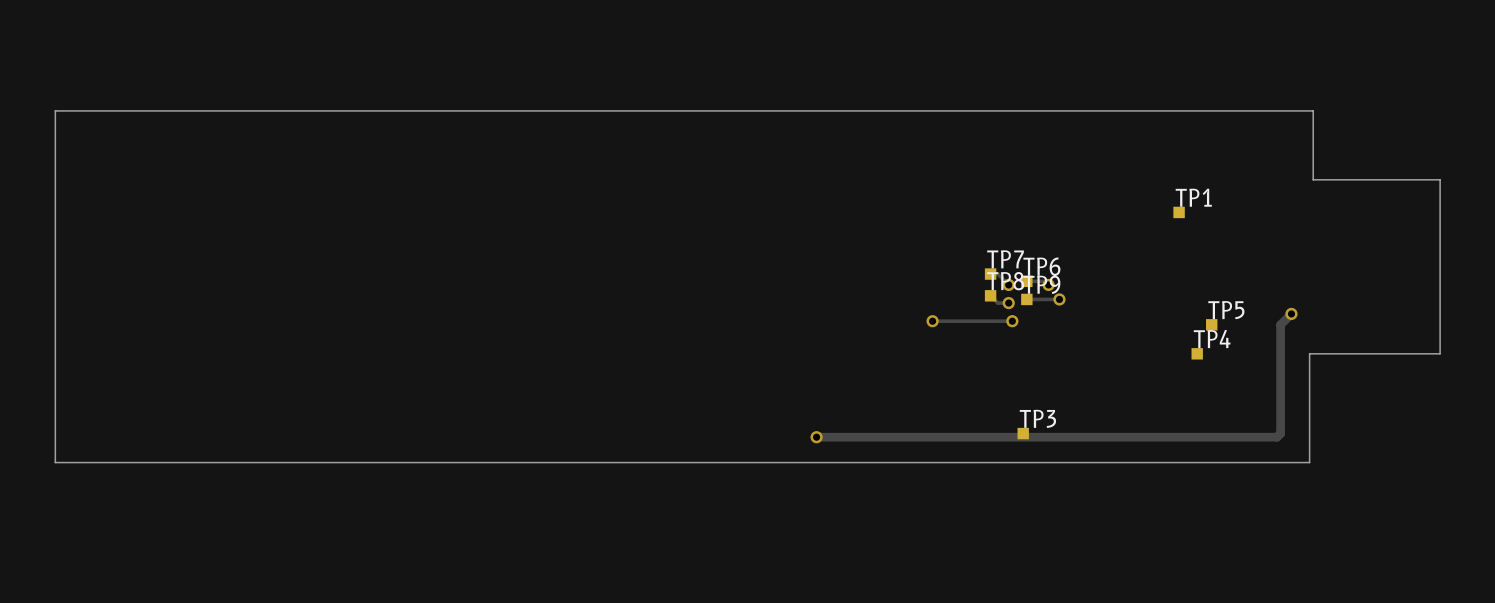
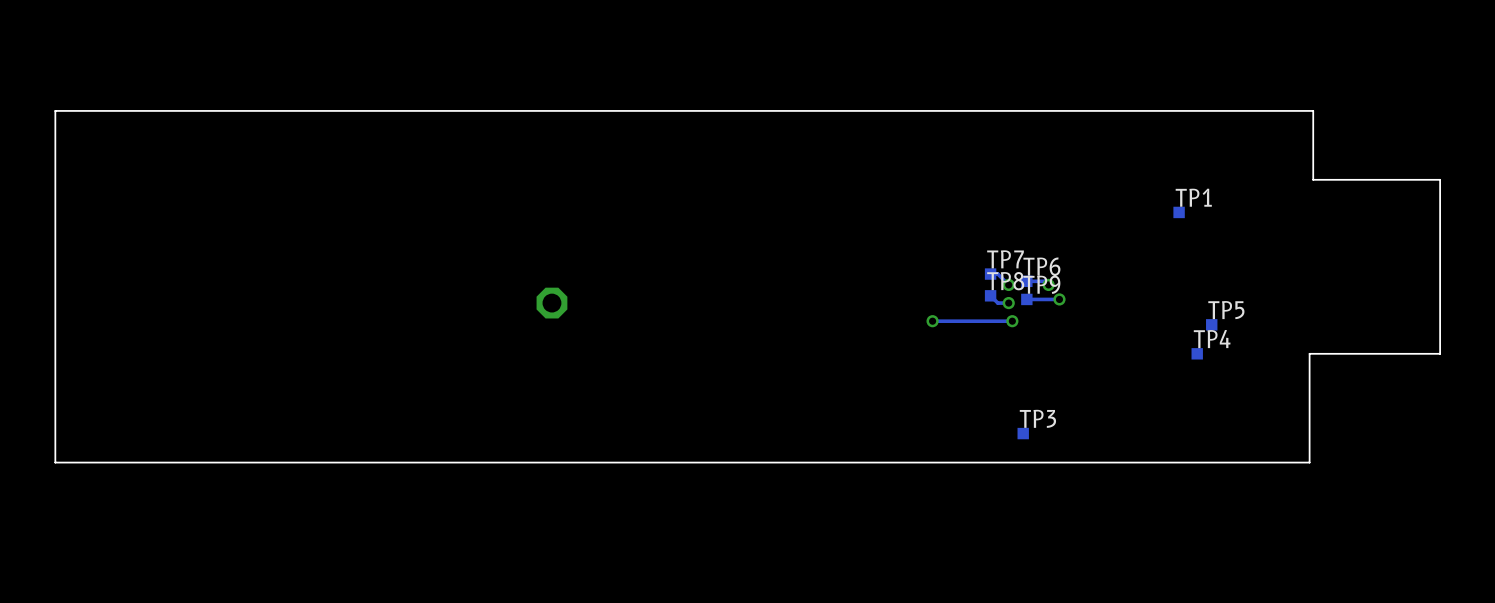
part: none -> (551, 303)
track: (1291, 313) (1280, 324) (1280, 433) (1276, 437) (816, 437) -> none
via: (1291, 313) -> none
via: (816, 437) -> none

